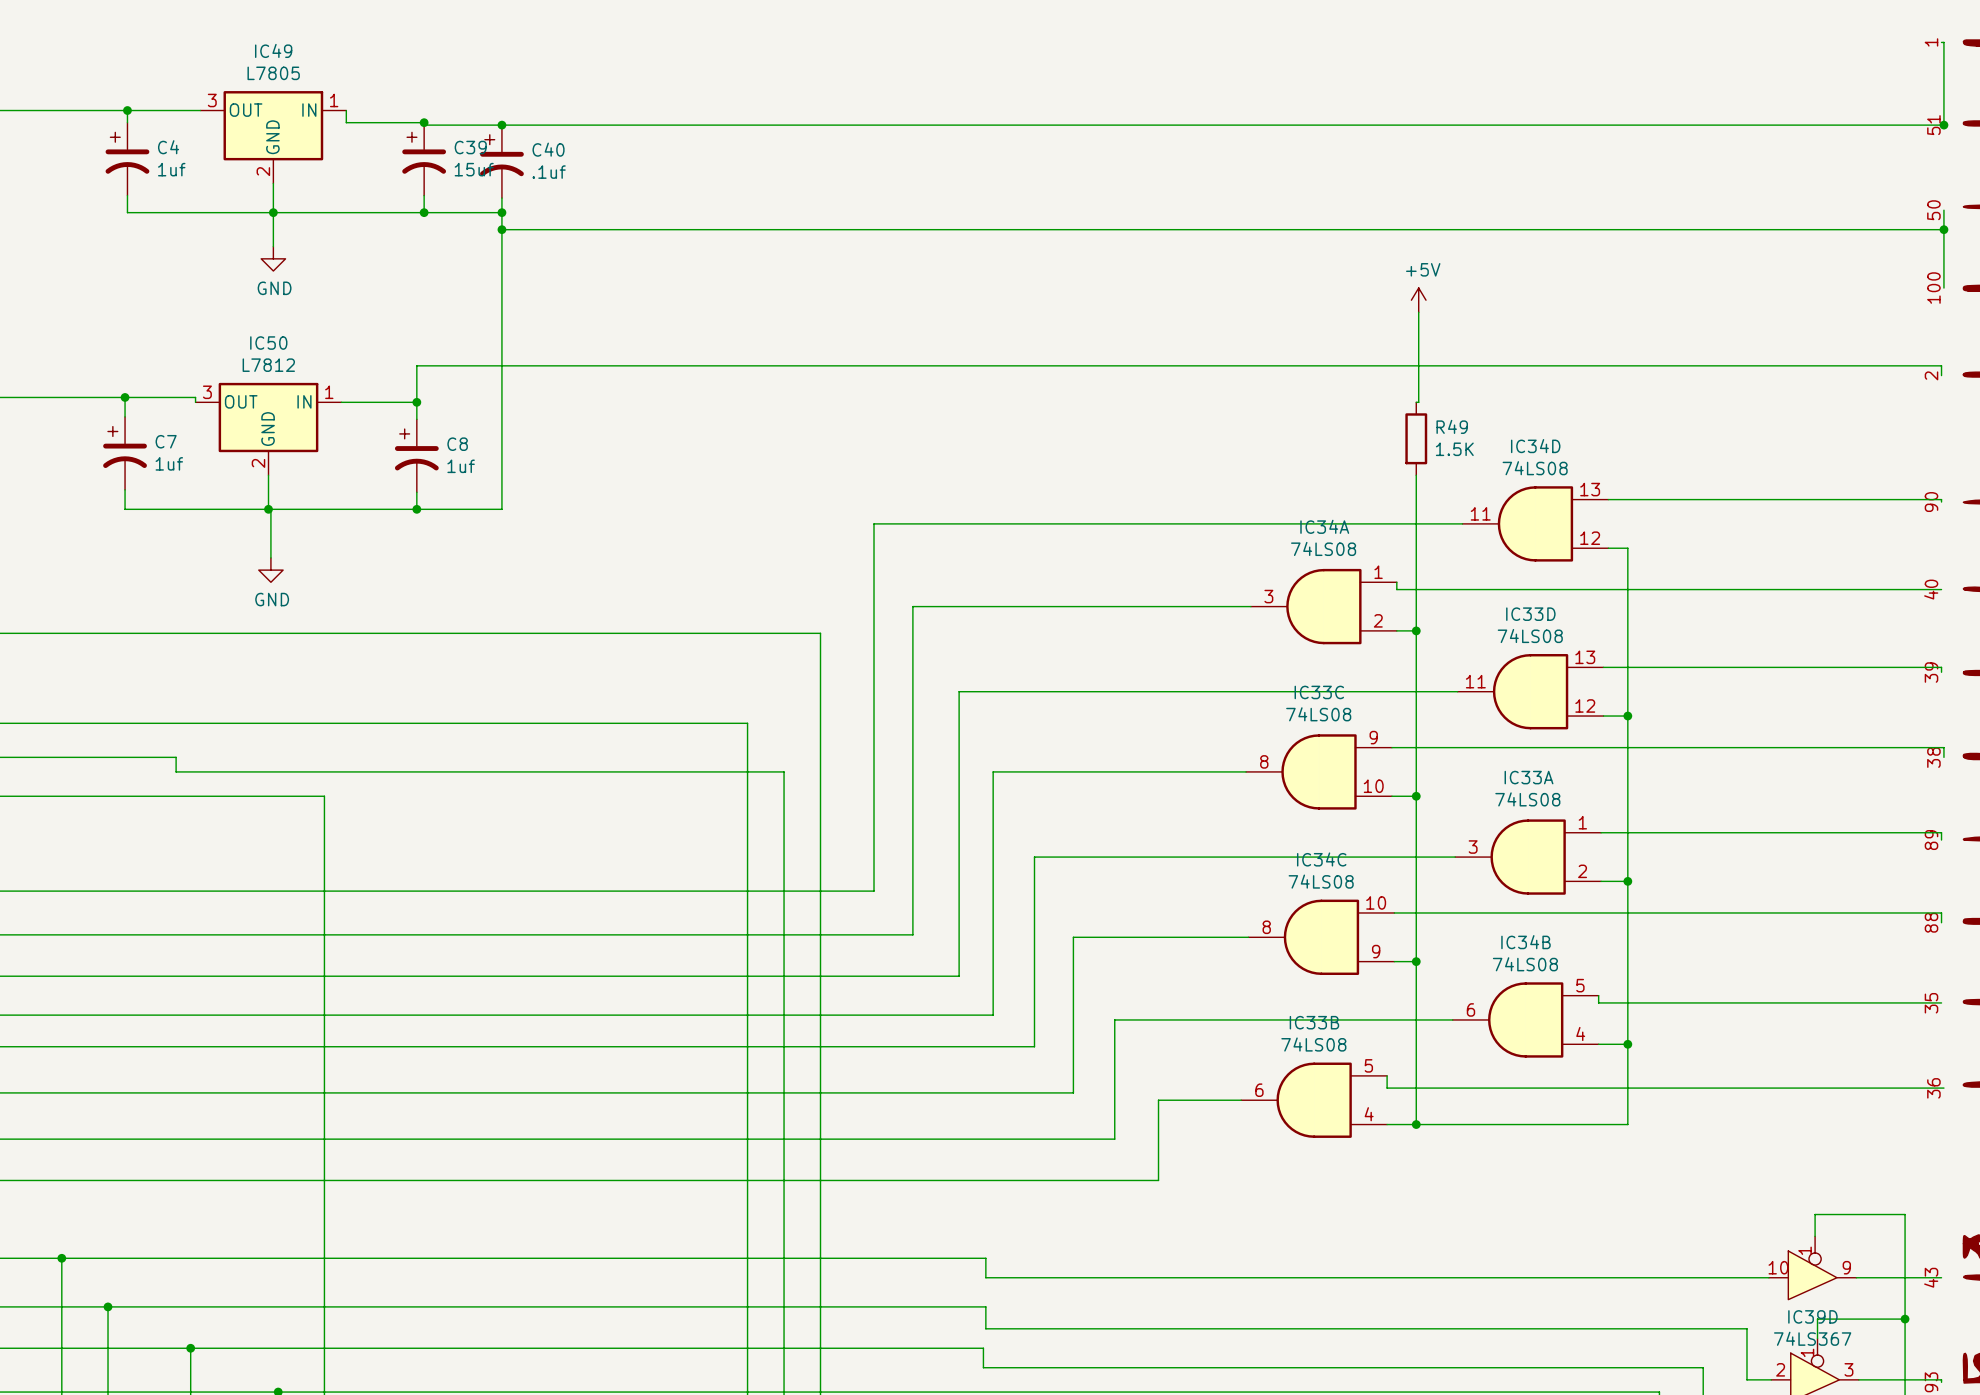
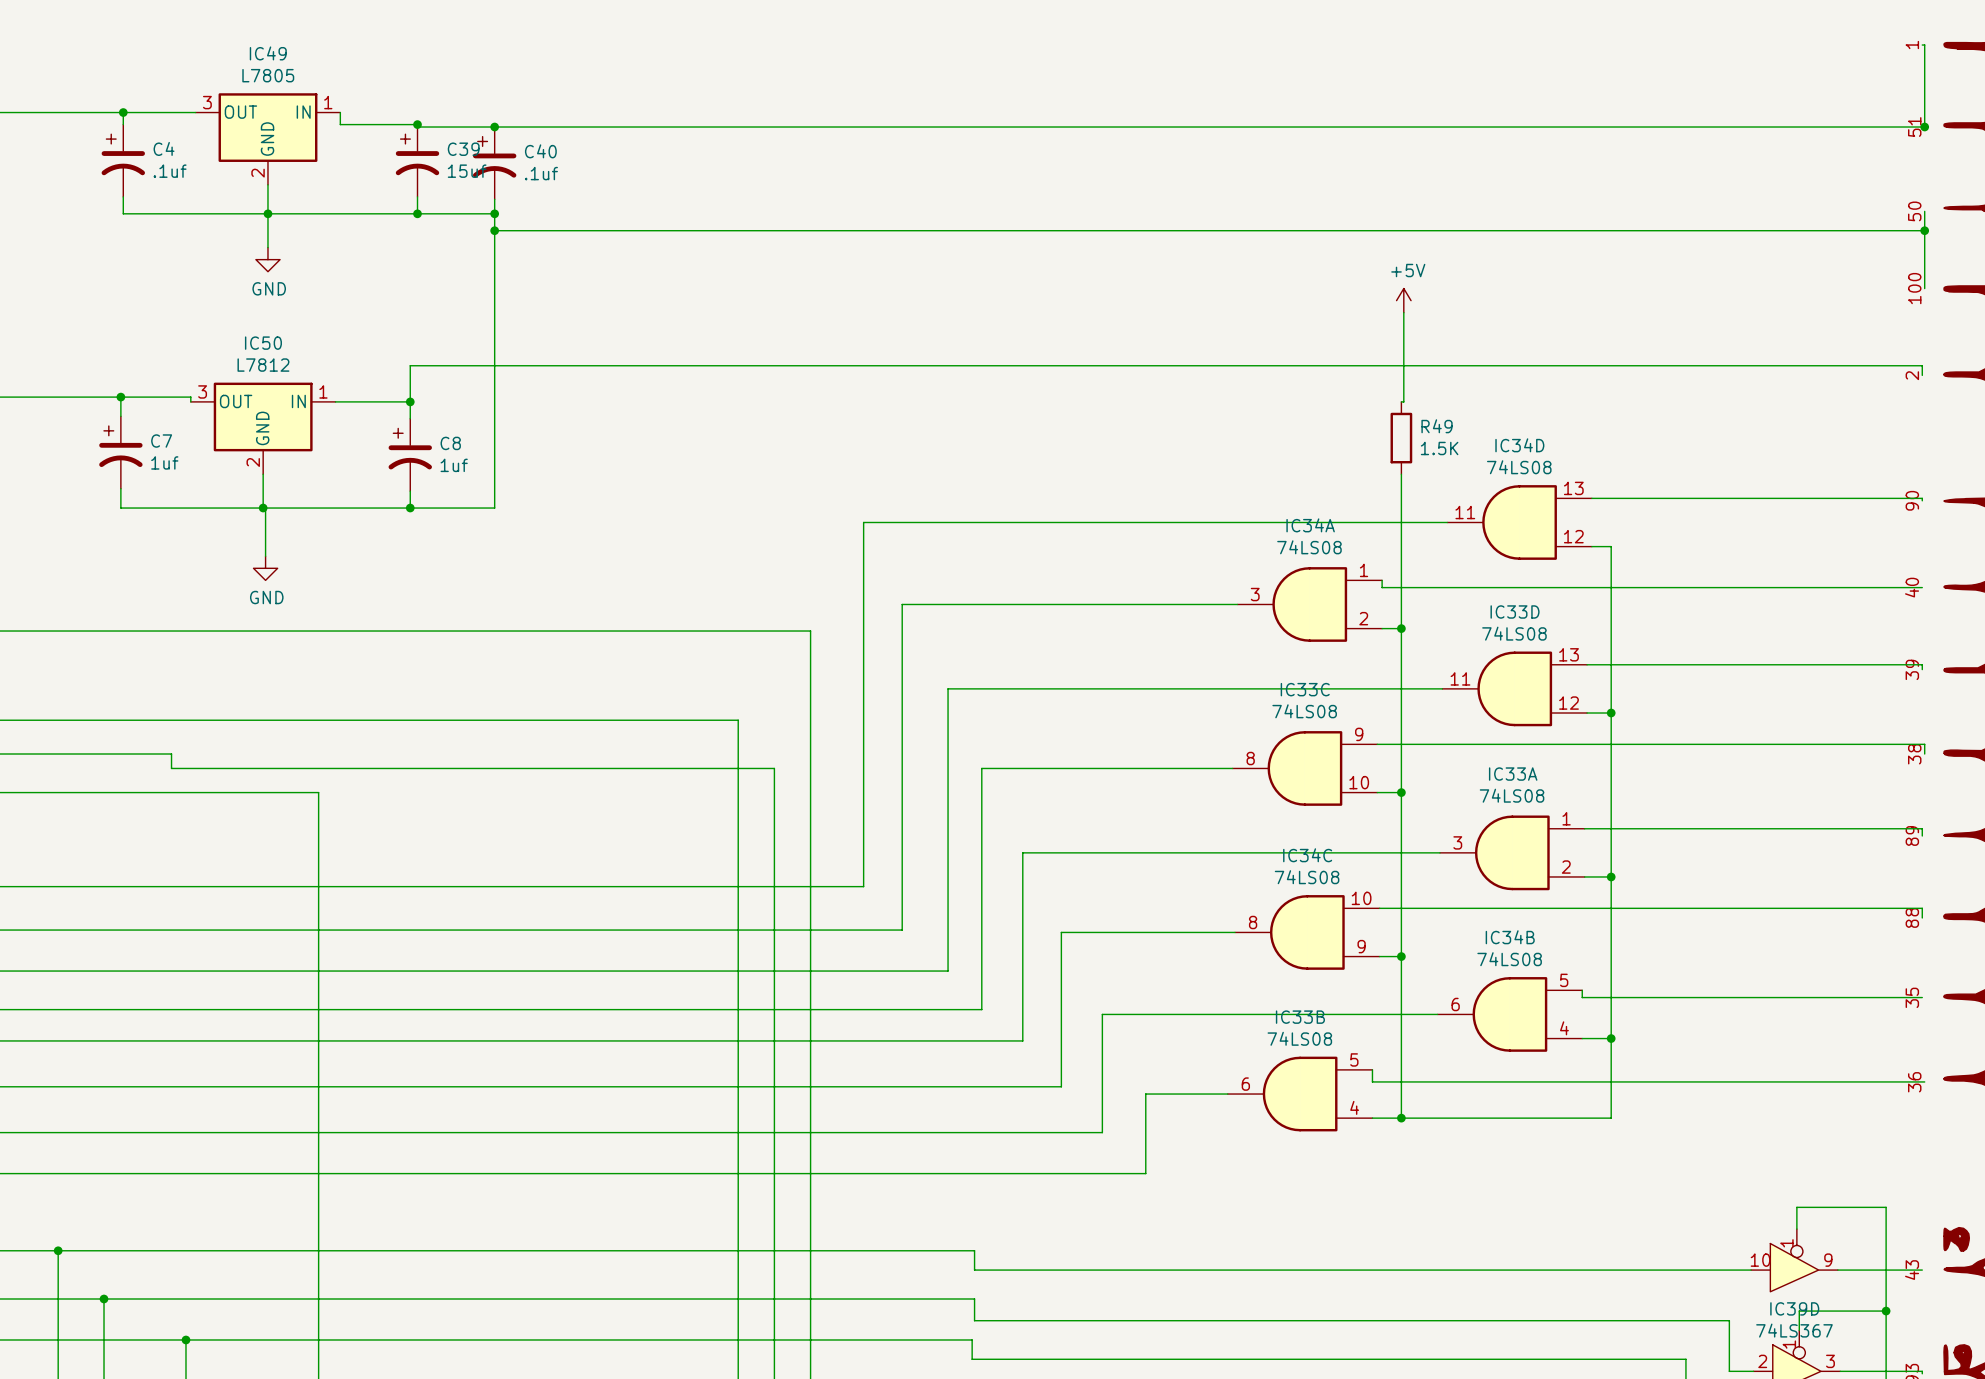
C4 value: 1uf (171, 169) -> .1uf (170, 171)

